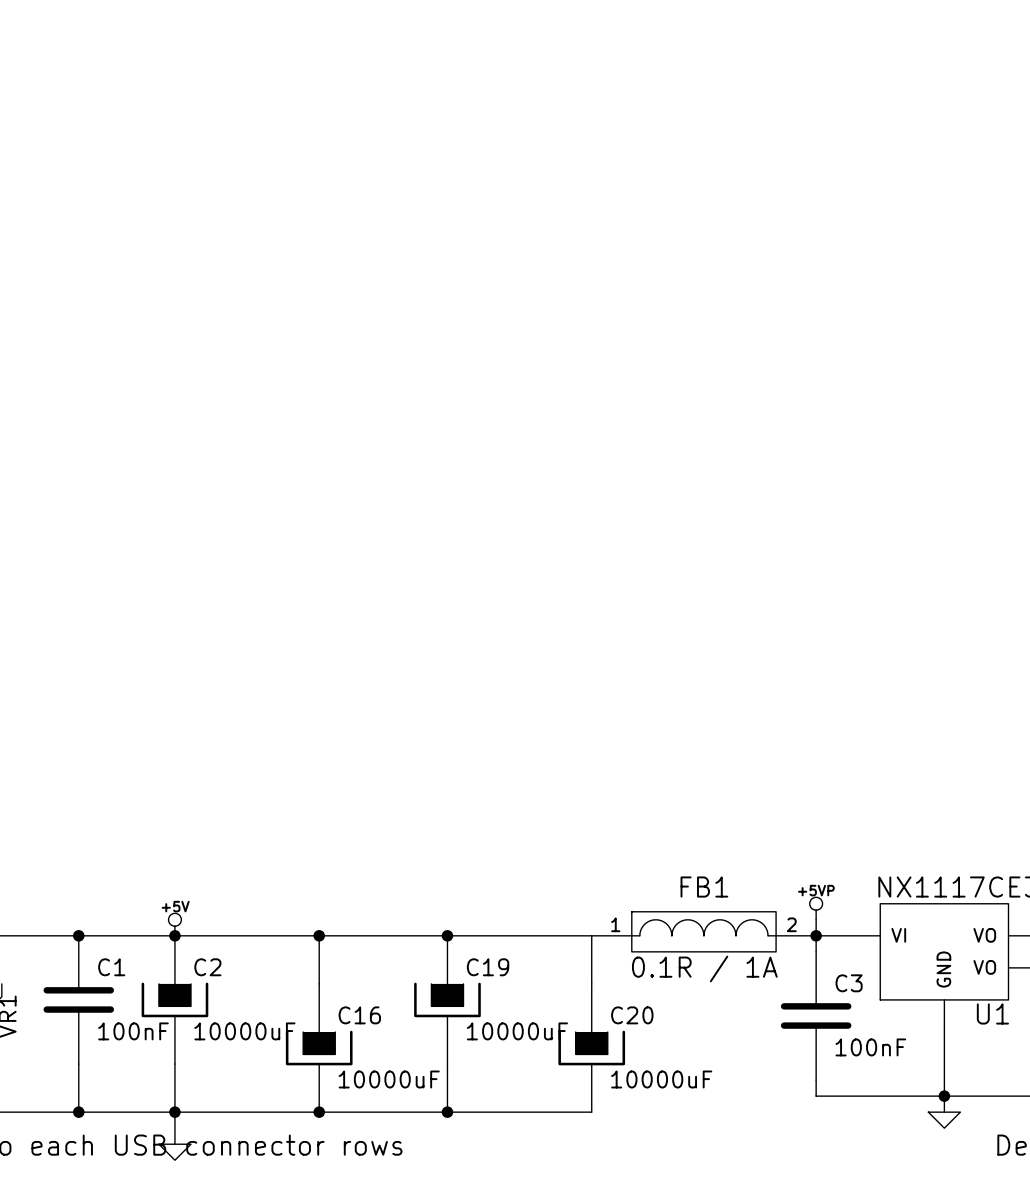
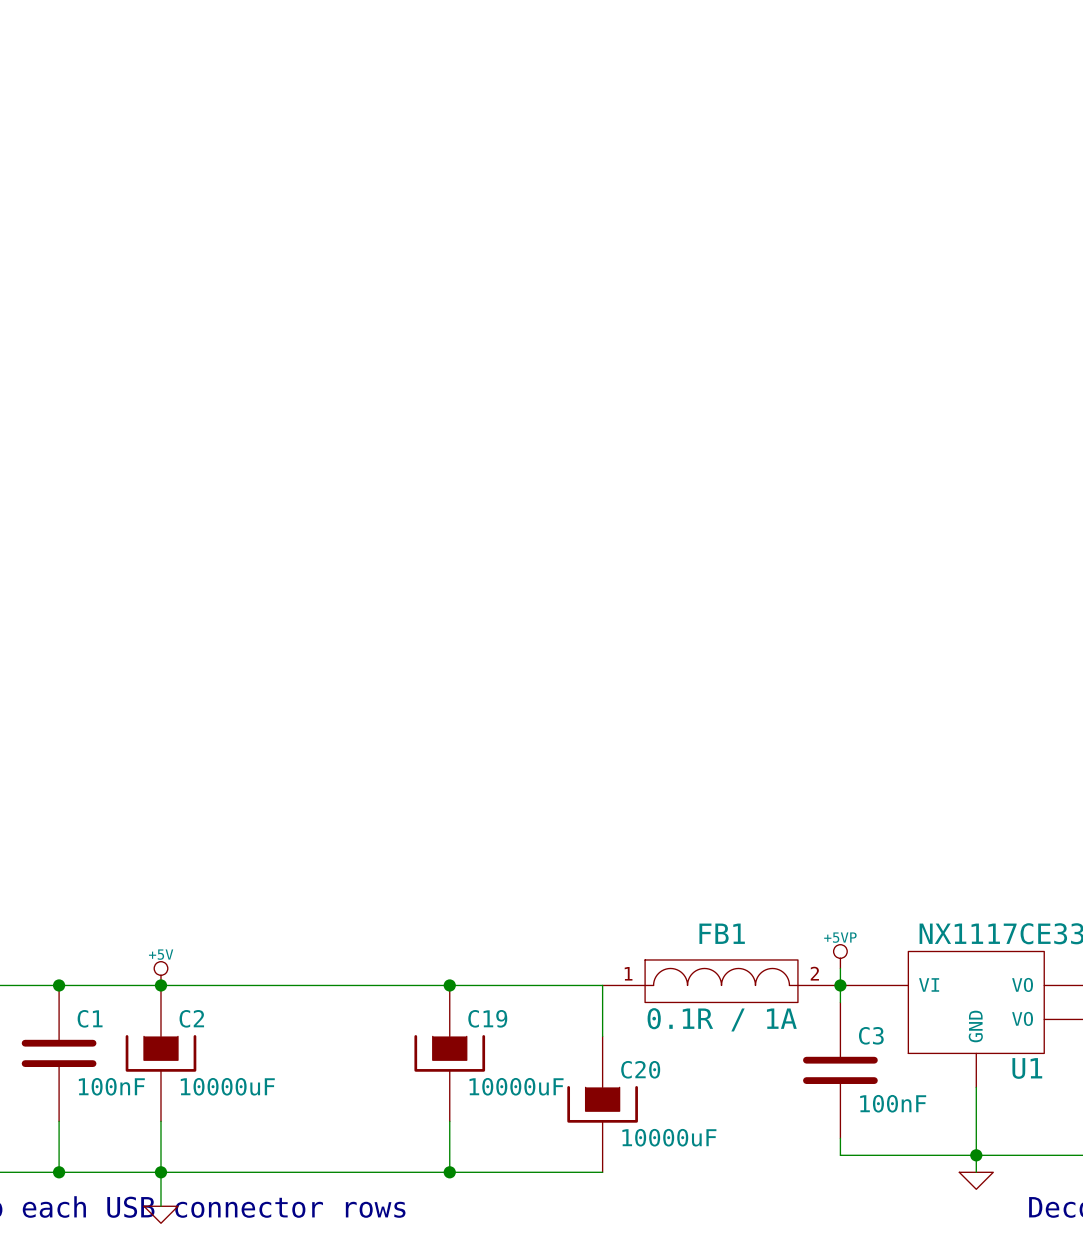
wire: (319, 935) (319, 983) -> none
junction: (319, 935) -> none
C16: 10000uF (319, 1048) -> none
junction: (319, 1112) -> none

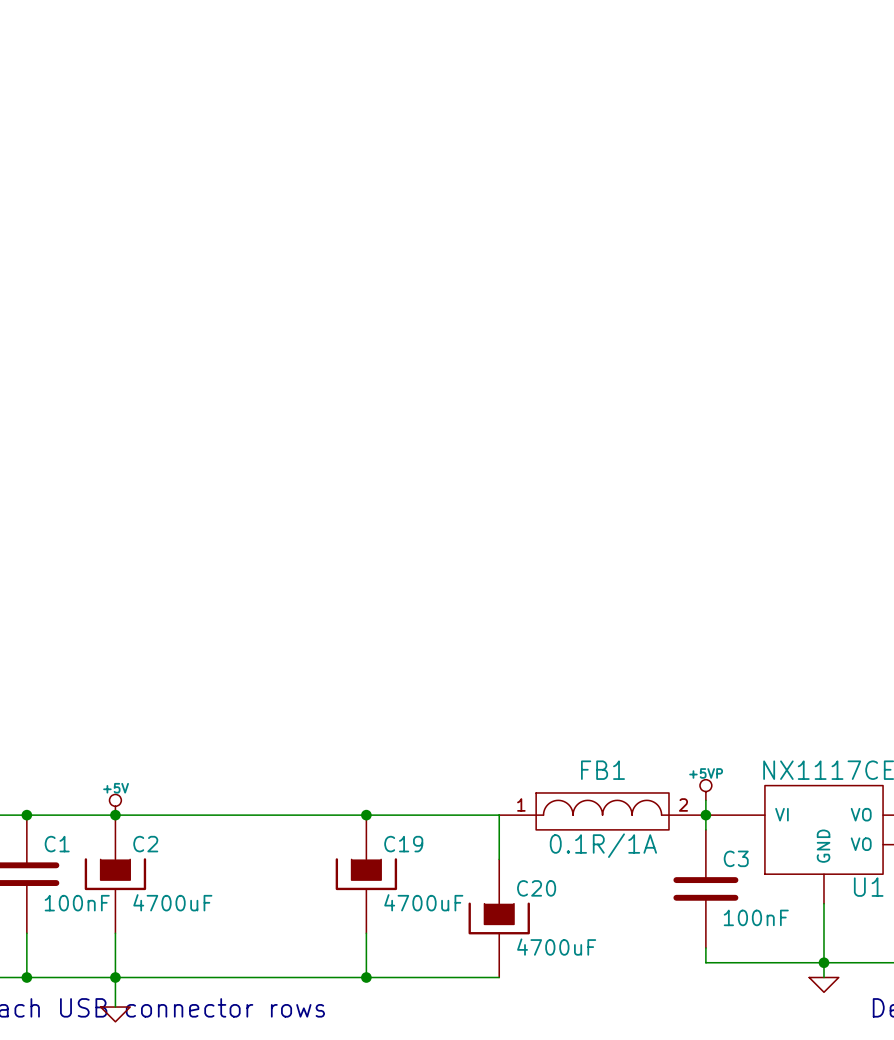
FB1 value: 0.1R / 1A (722, 1019) -> 0.1R/1A (603, 845)
C2 value: 10000uF (227, 1086) -> 4700uF (172, 902)
C19 value: 10000uF (516, 1086) -> 4700uF (423, 902)
C20 value: 10000uF (669, 1137) -> 4700uF (556, 947)

